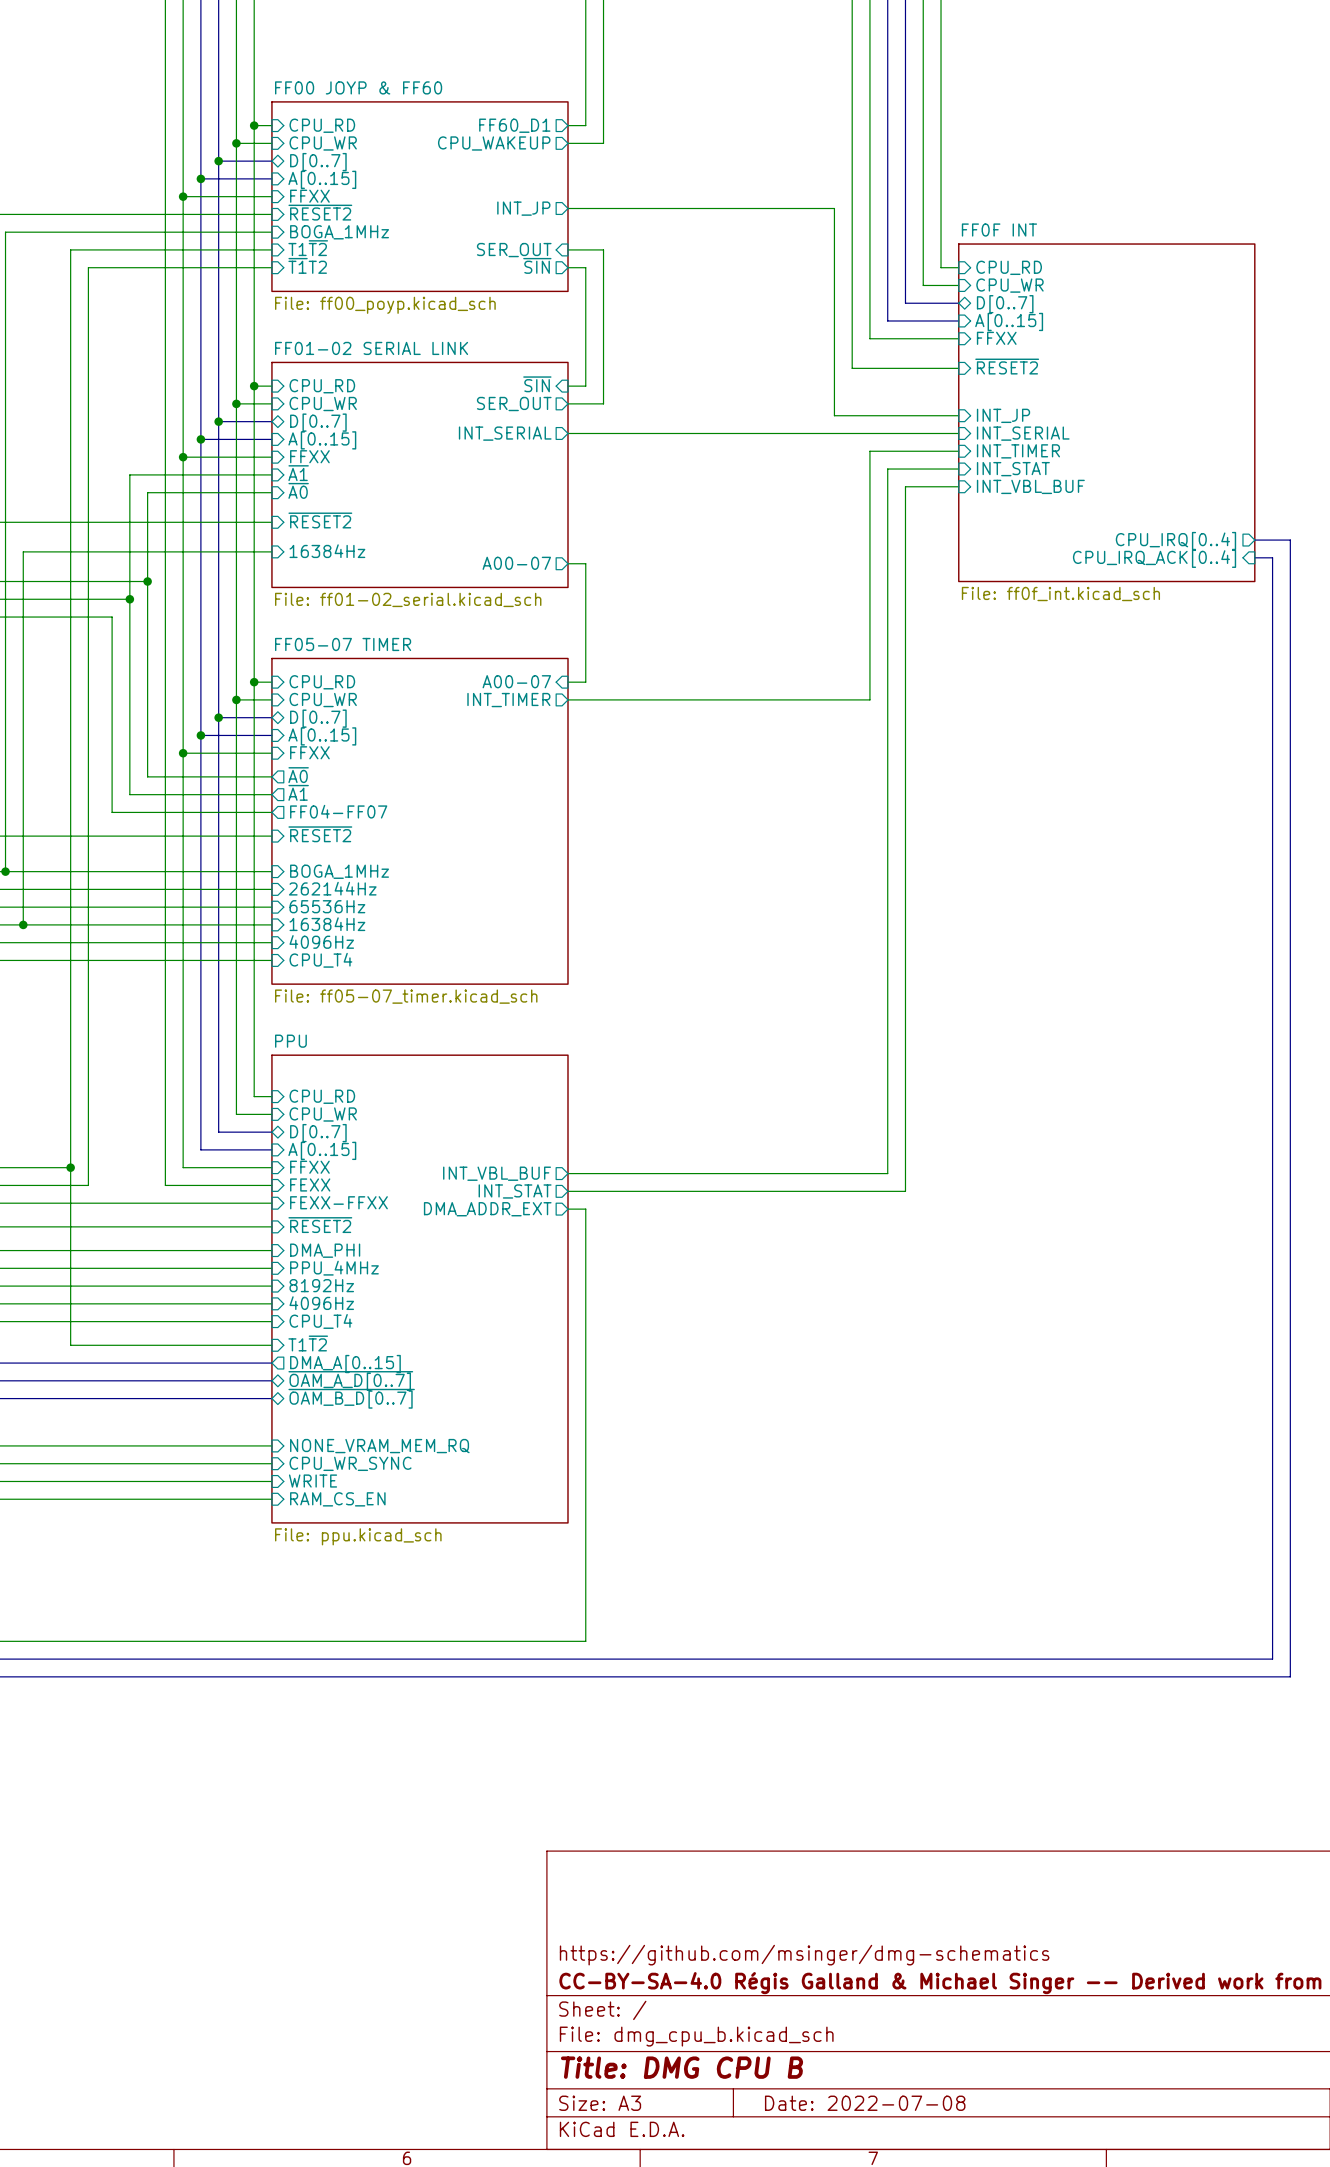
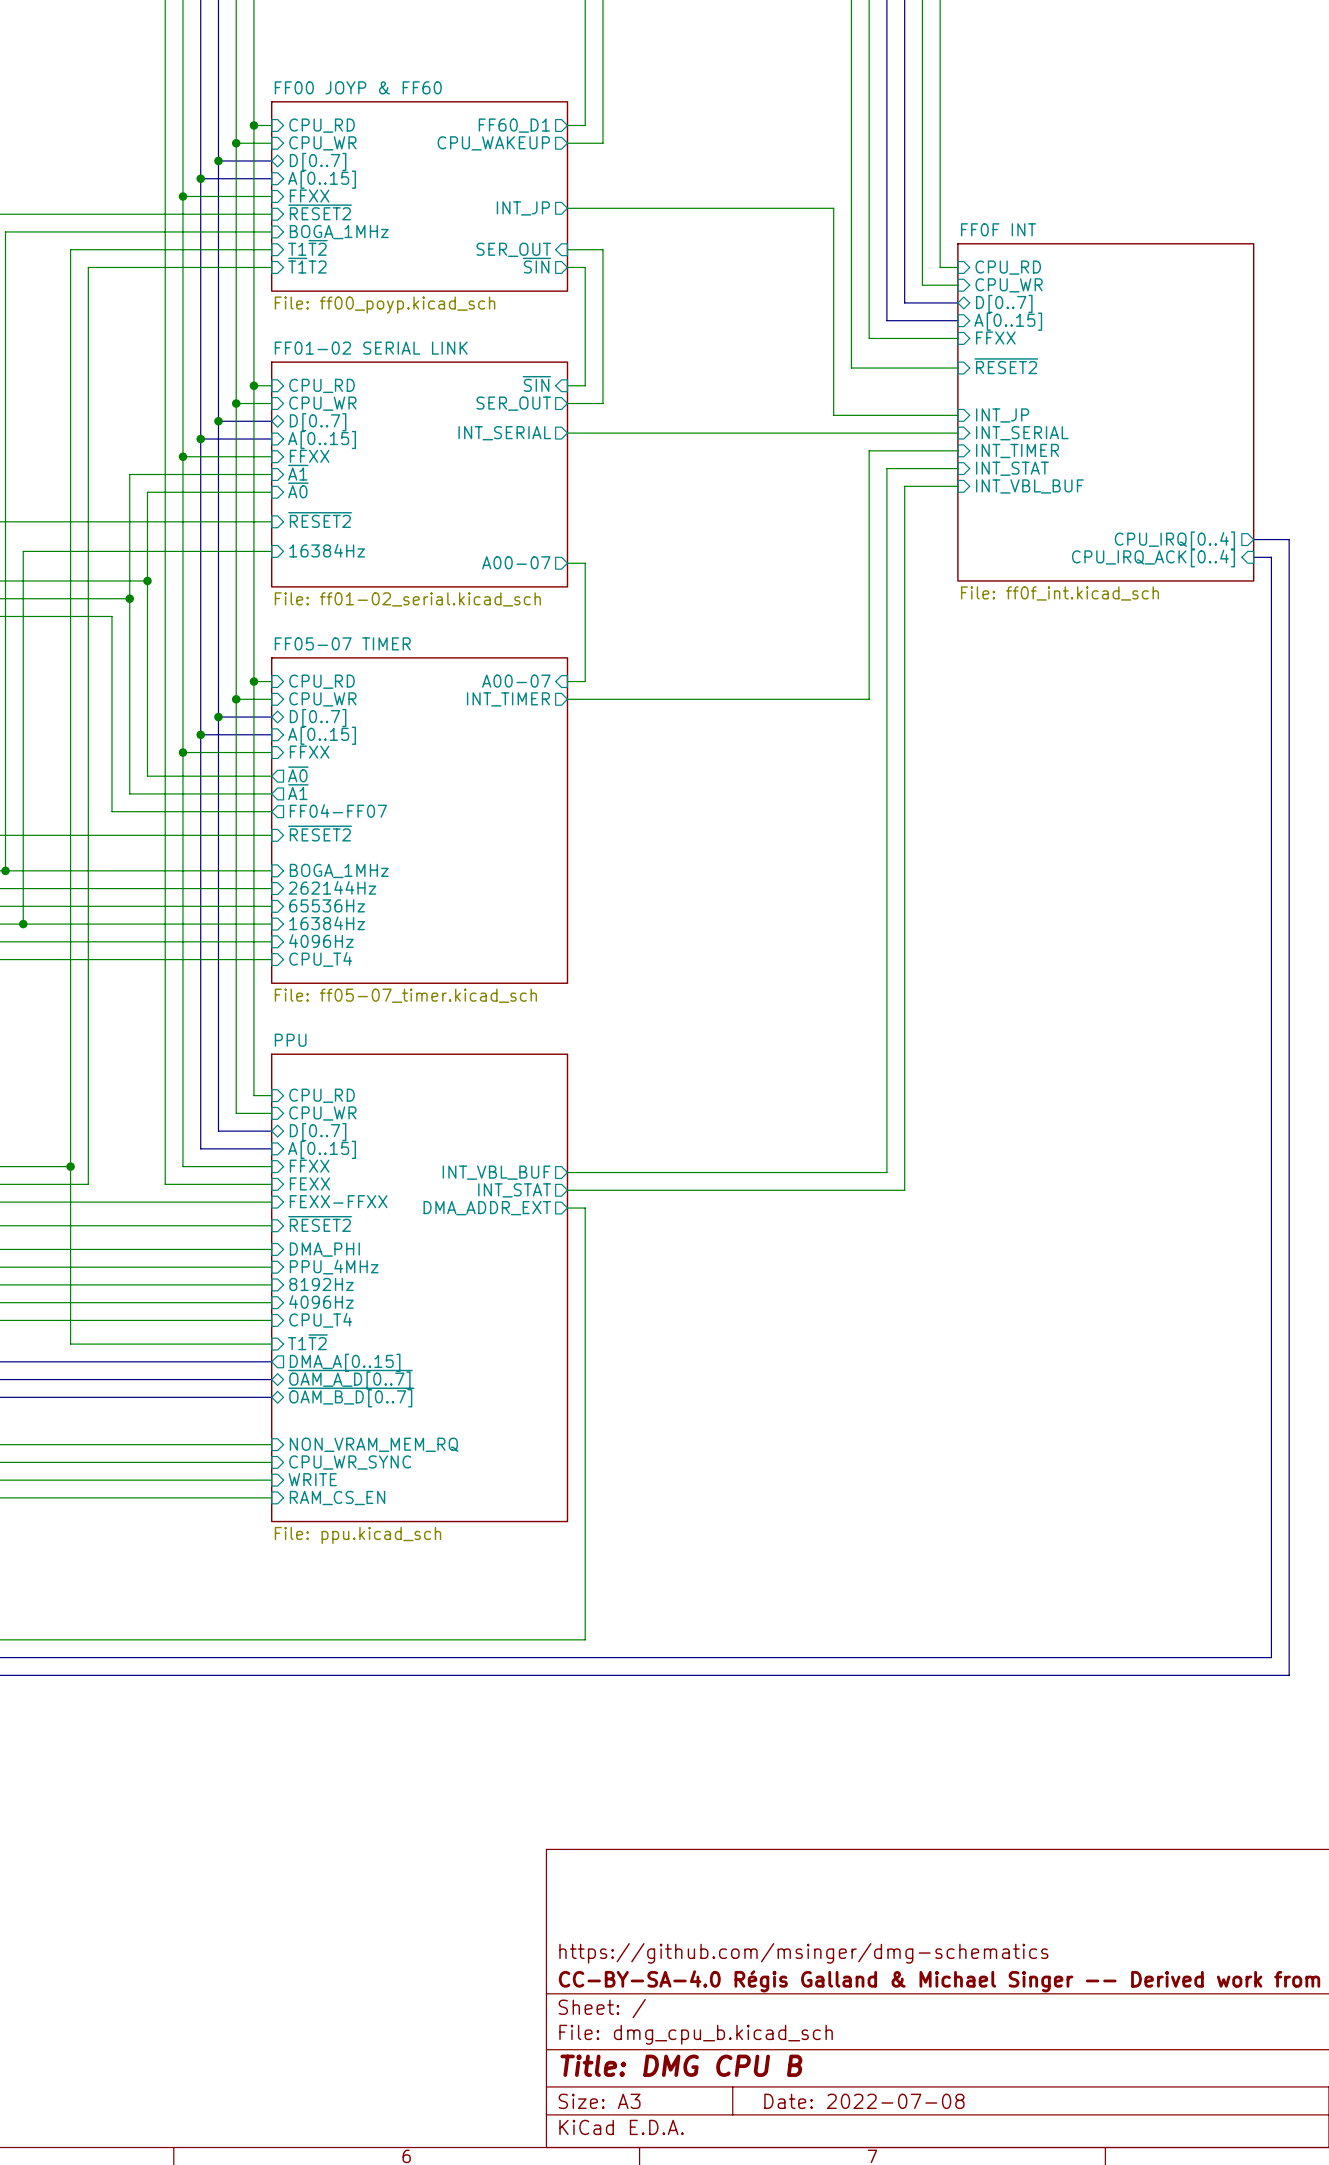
sheet pin: NONE_VRAM_MEM_RQ (379, 1446) -> NON_VRAM_MEM_RQ (374, 1444)

